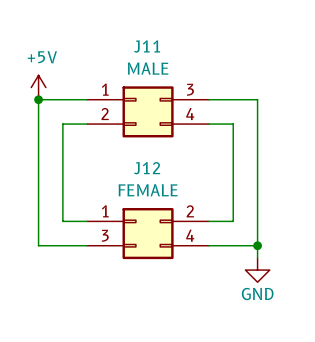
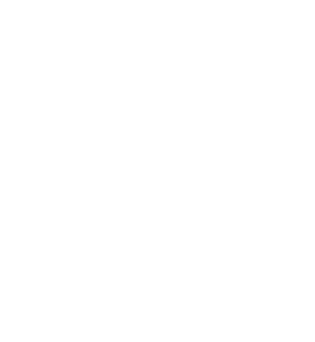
power symbol: +5V (38, 87) -> none
junction: (38, 99) -> none
wire: (87, 99) (38, 99) (38, 245) (87, 245) -> none
wire: (208, 99) (257, 99) (257, 257) -> none
J11: MALE (148, 111) -> none
wire: (87, 124) (62, 124) (62, 221) (87, 221) -> none
wire: (208, 124) (233, 124) (233, 221) (208, 221) -> none
J12: FEMALE (148, 233) -> none
wire: (208, 245) (257, 245) -> none
junction: (257, 245) -> none
power symbol: GND (257, 270) -> none

